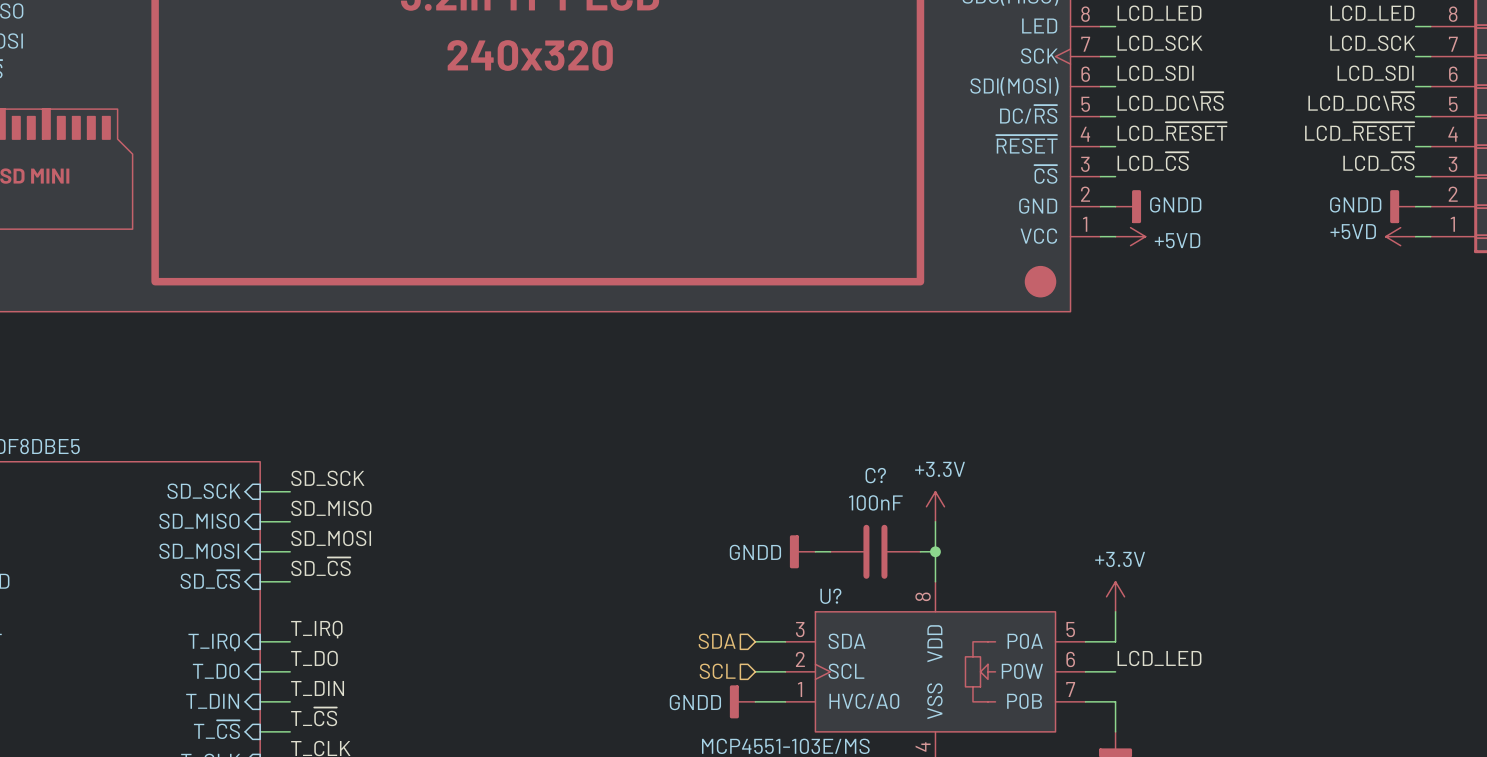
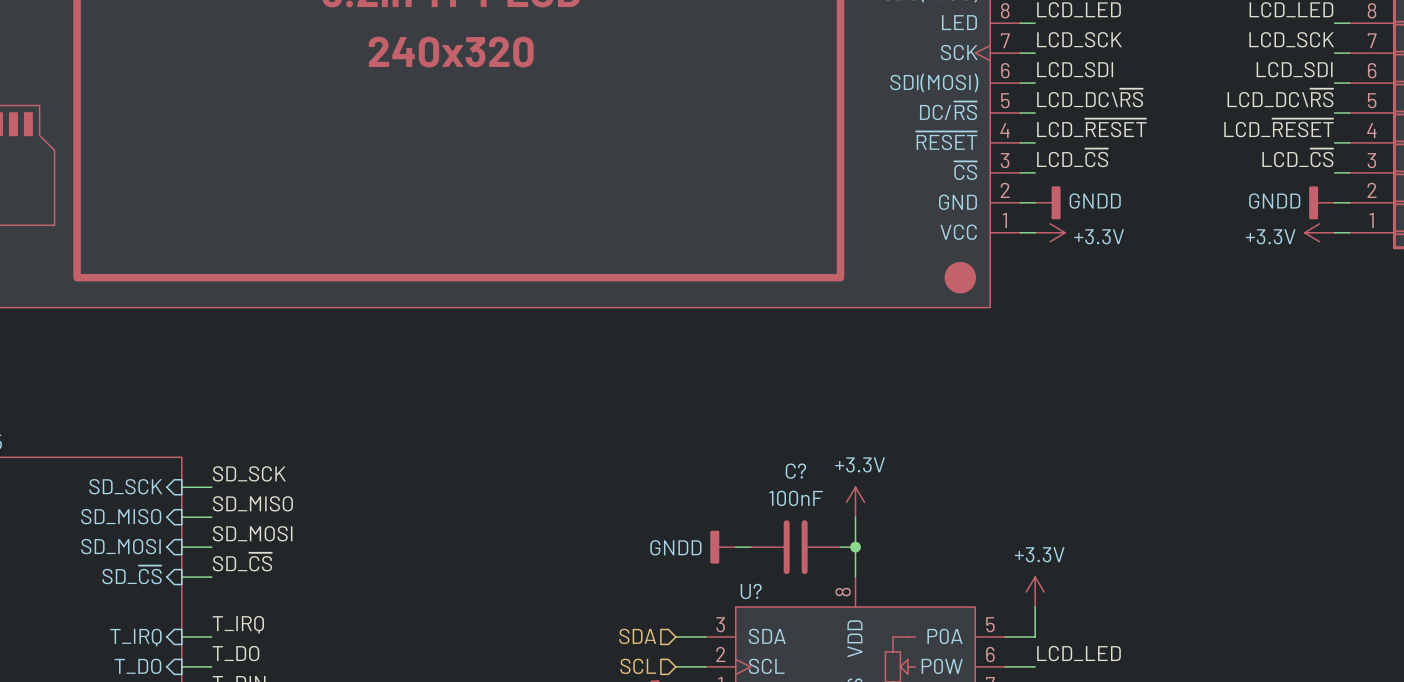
power symbol: +5VD (1130, 236) -> +3.3V (1050, 232)
power symbol: +5VD (1400, 236) -> +3.3V (1319, 232)

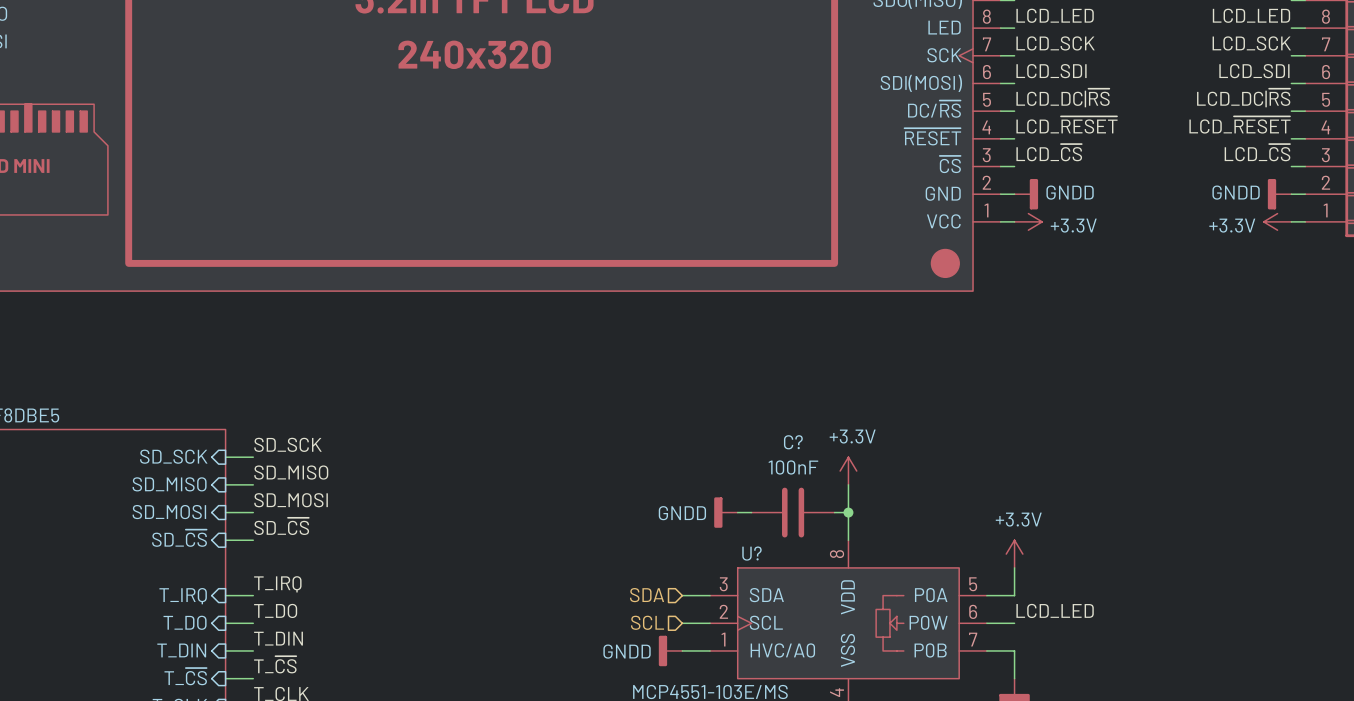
label: LCD_DC\~{RS} (1090, 98) -> LCD_DC|~{RS} (1063, 98)
label: LCD_DC\~{RS} (1280, 98) -> LCD_DC|~{RS} (1243, 98)

